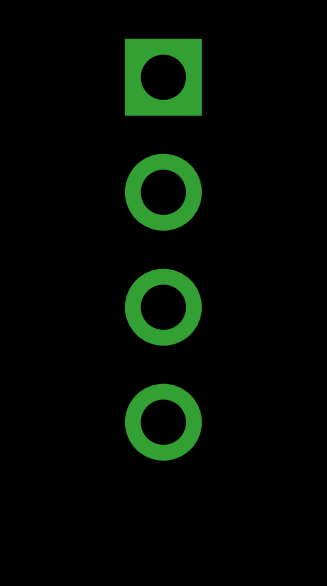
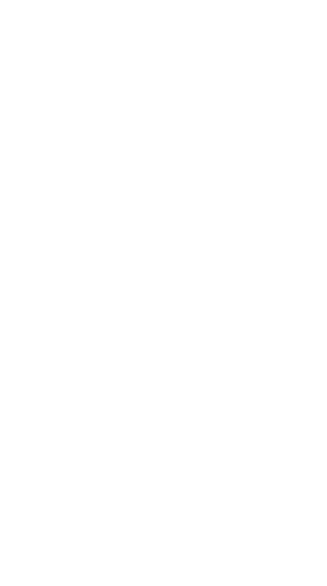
part: (163, 249) -> none

